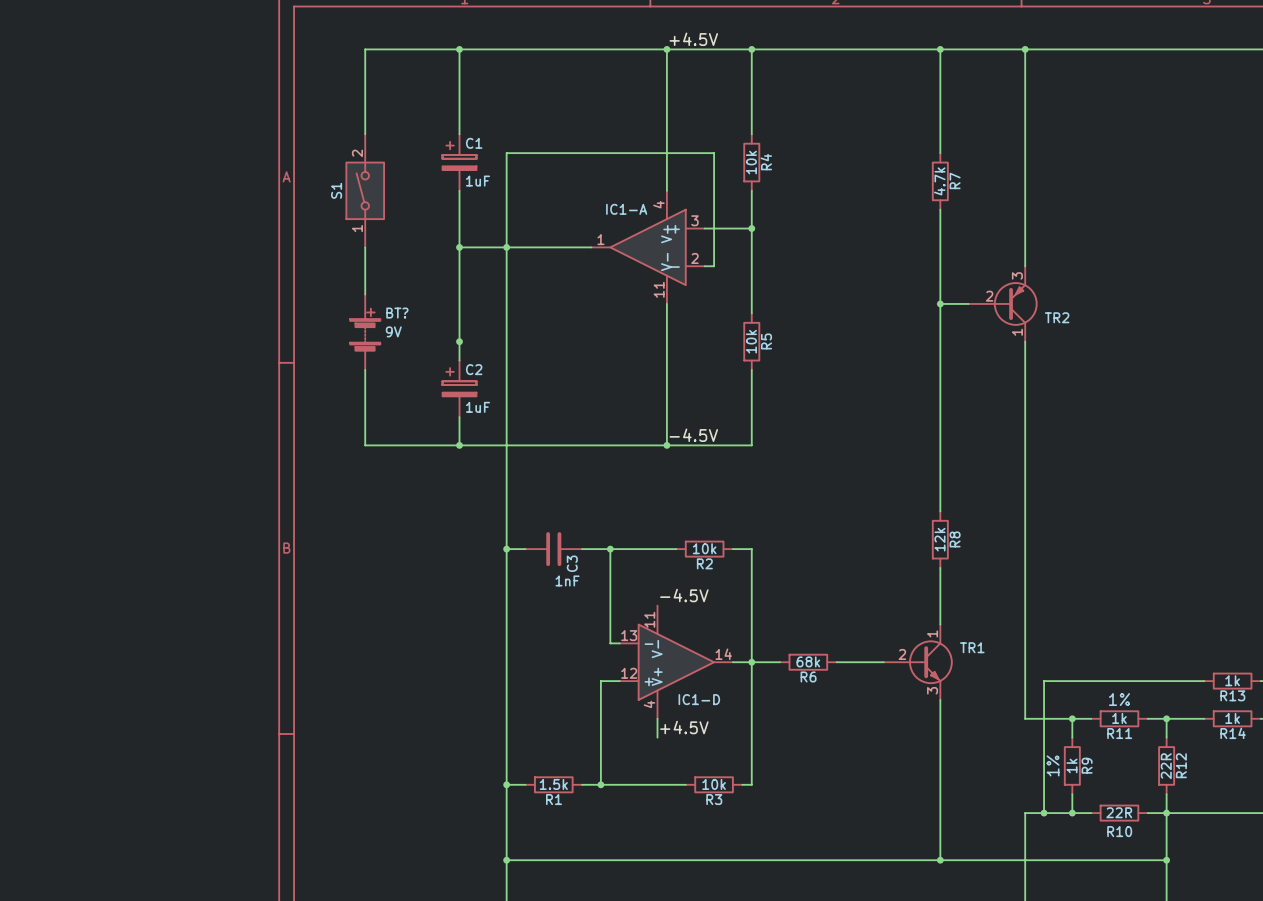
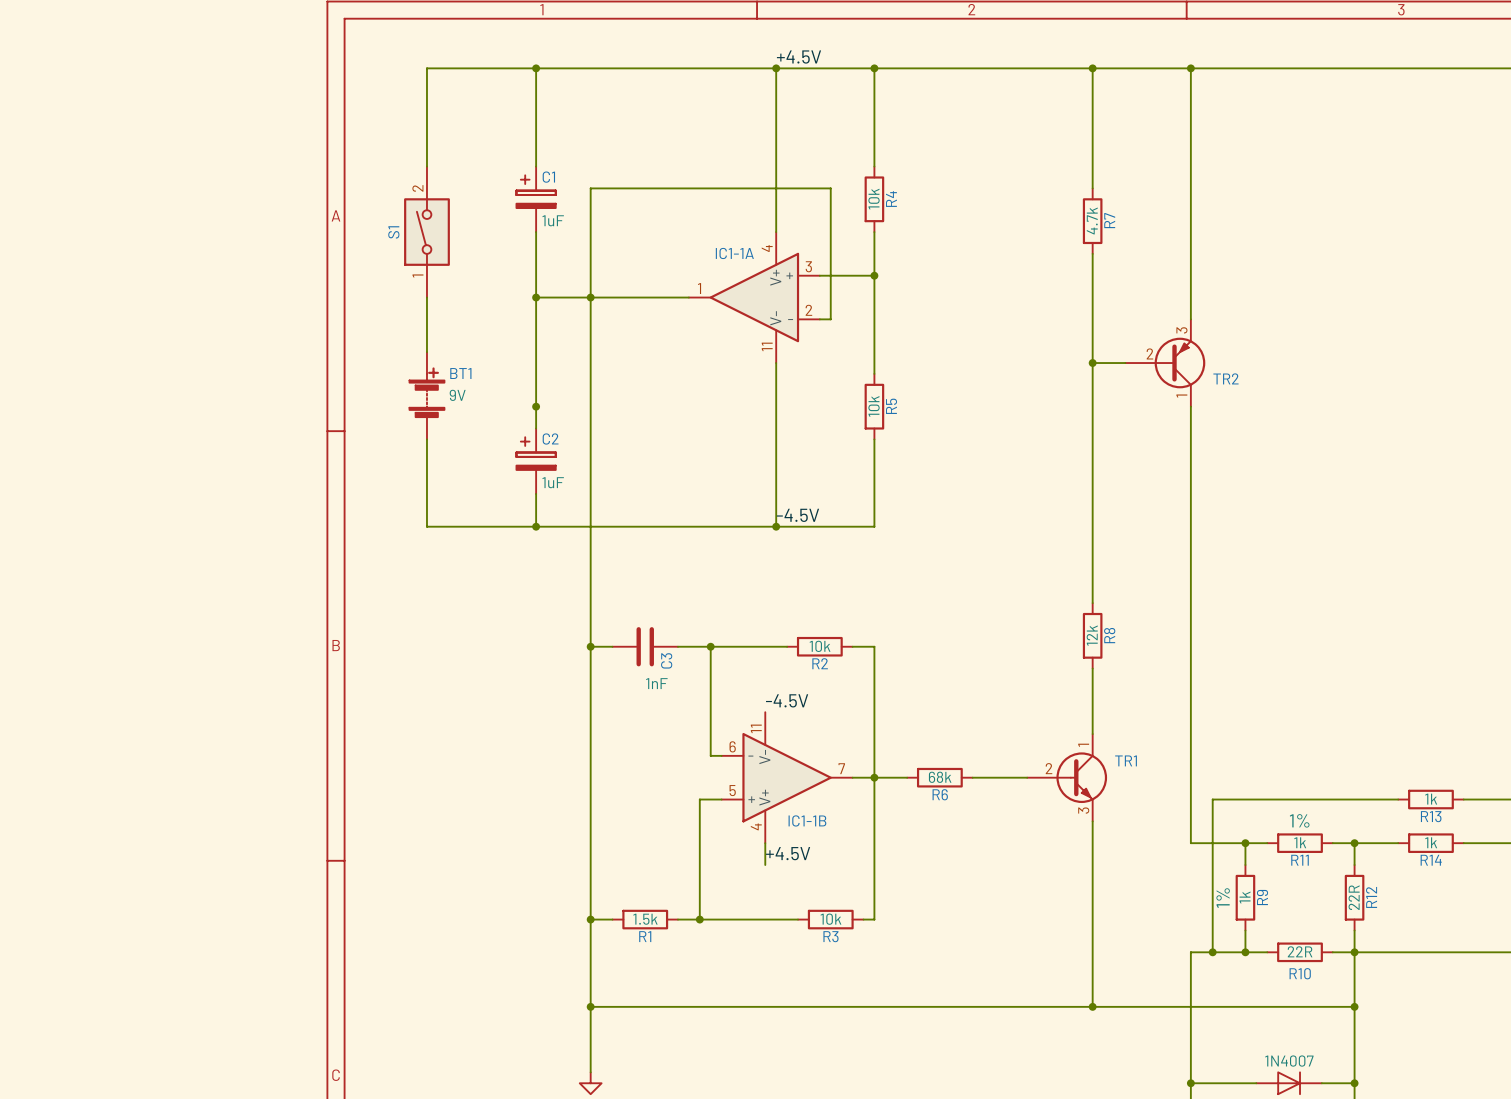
IC1-A name: IC1-A (626, 209) -> IC1-1A (734, 253)
BT? name: BT? (397, 313) -> BT1 (460, 373)
IC1-D pin number: 13 (629, 635) -> 6 (732, 746)
IC1-D pin number: 14 (723, 654) -> 7 (841, 768)
IC1-D pin number: 12 (629, 673) -> 5 (732, 790)
IC1-D name: IC1-D (699, 699) -> IC1-1B (807, 820)

